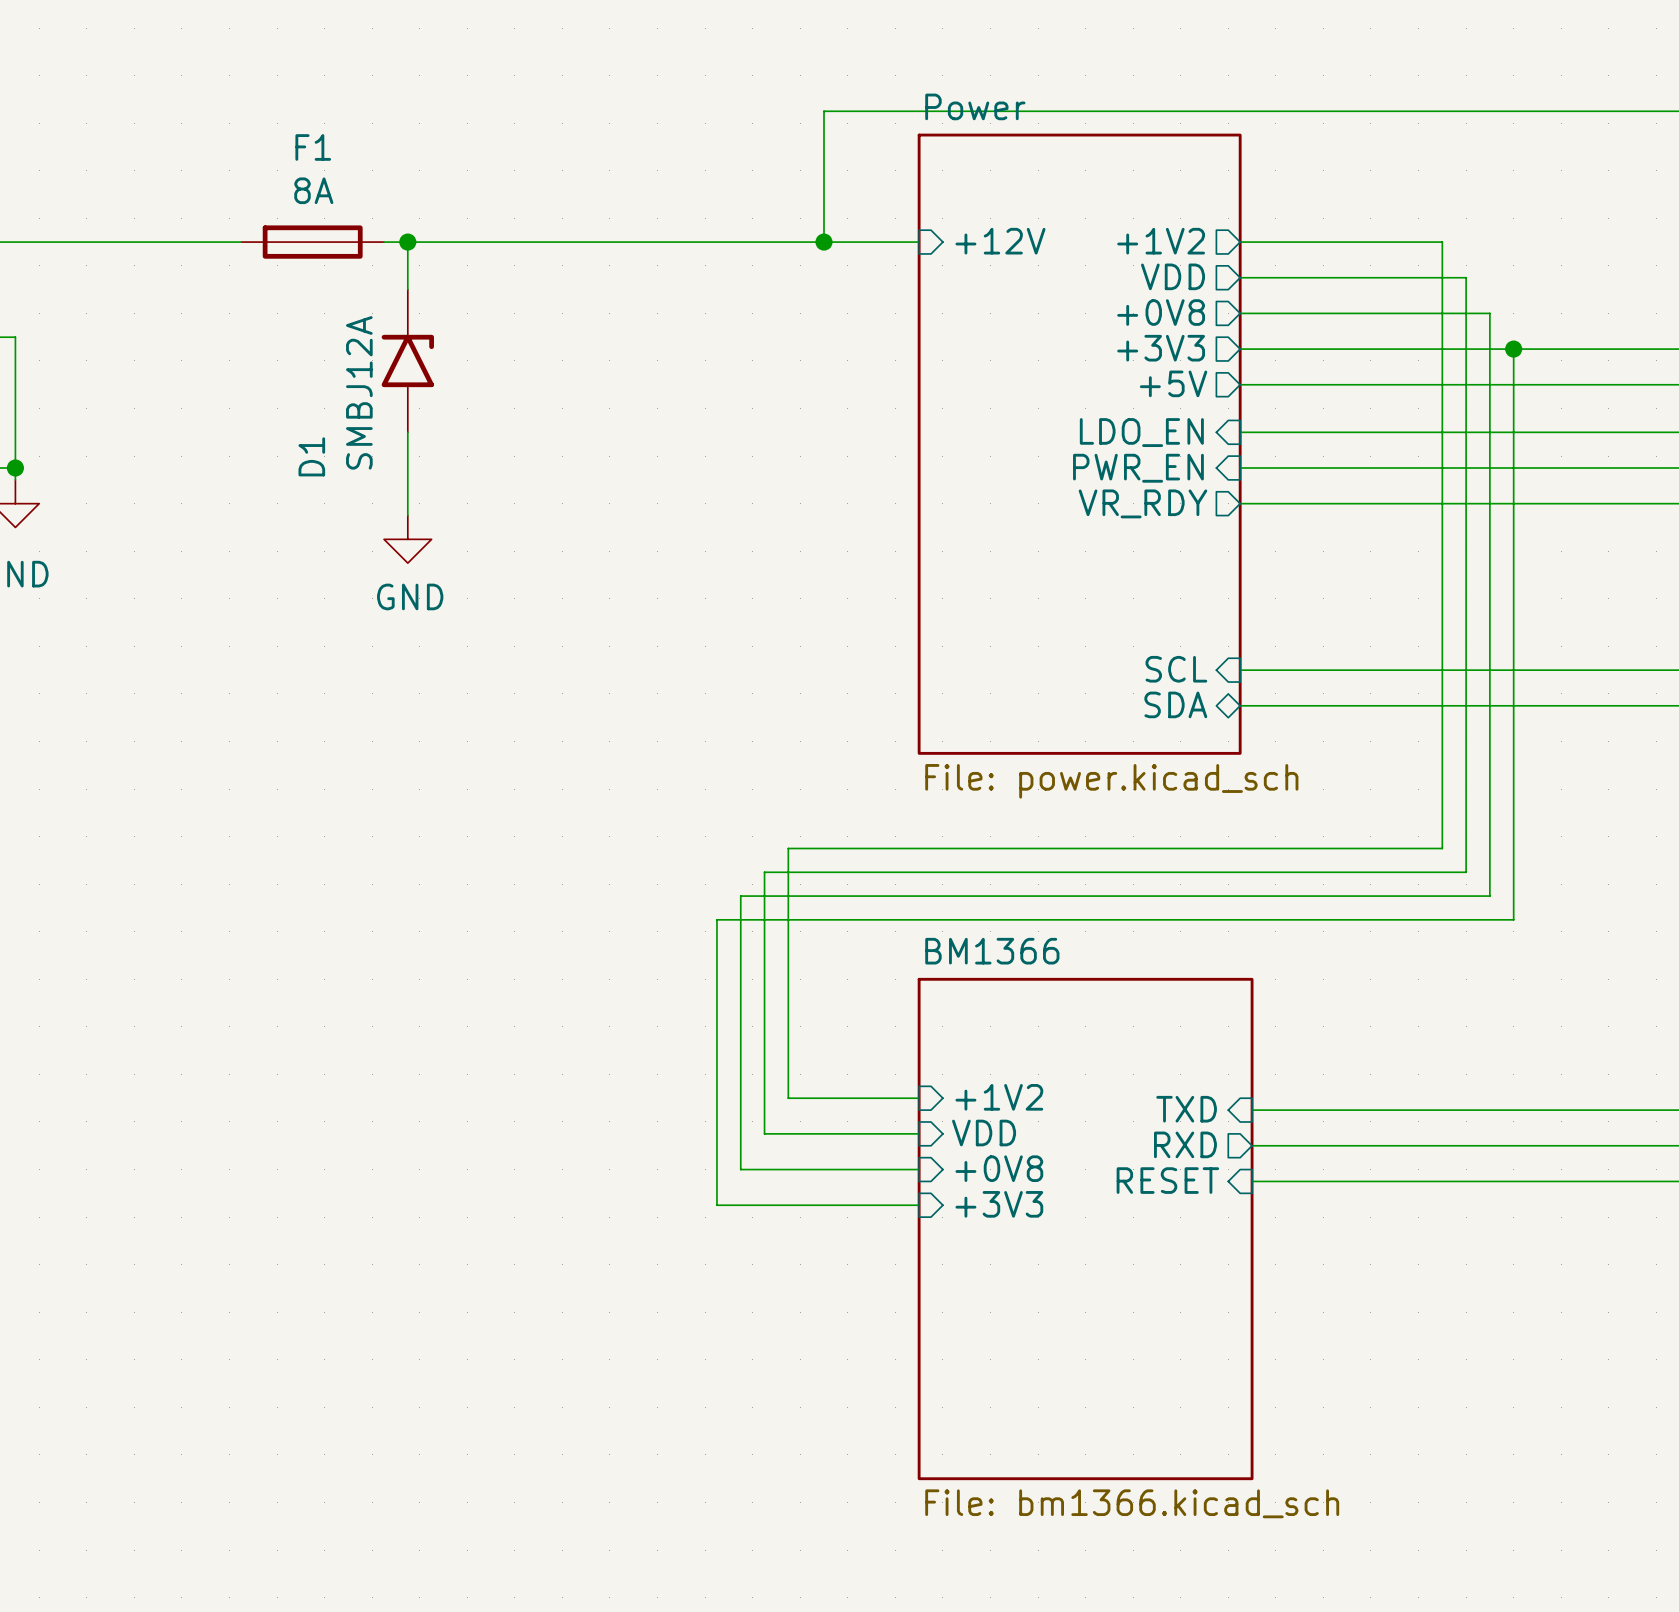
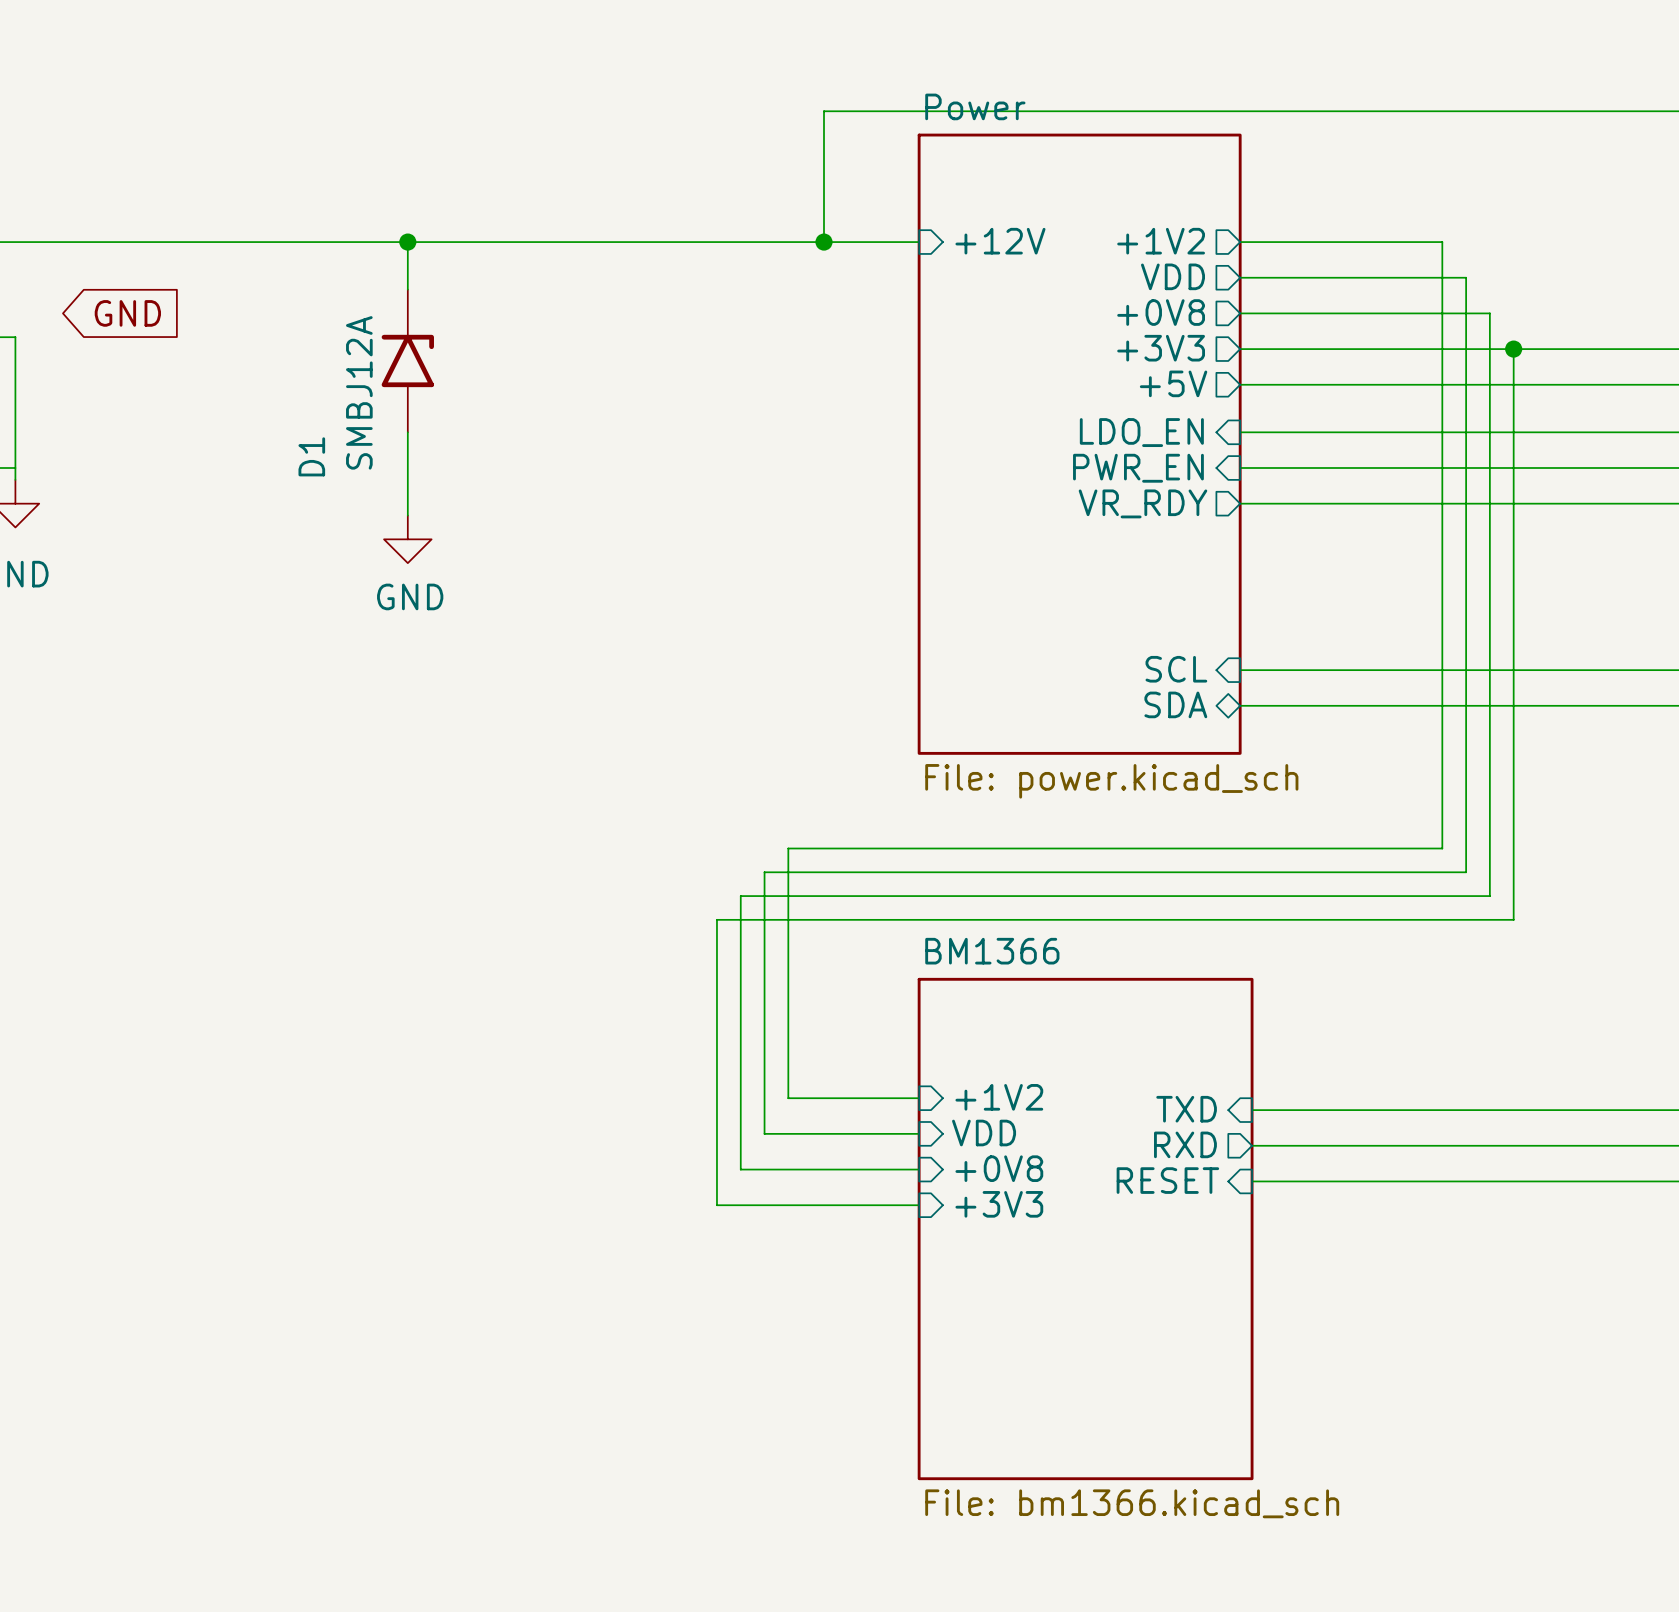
F1: 8A (312, 242) -> none
global label: none -> GND (127, 313)
junction: (15, 467) -> none

